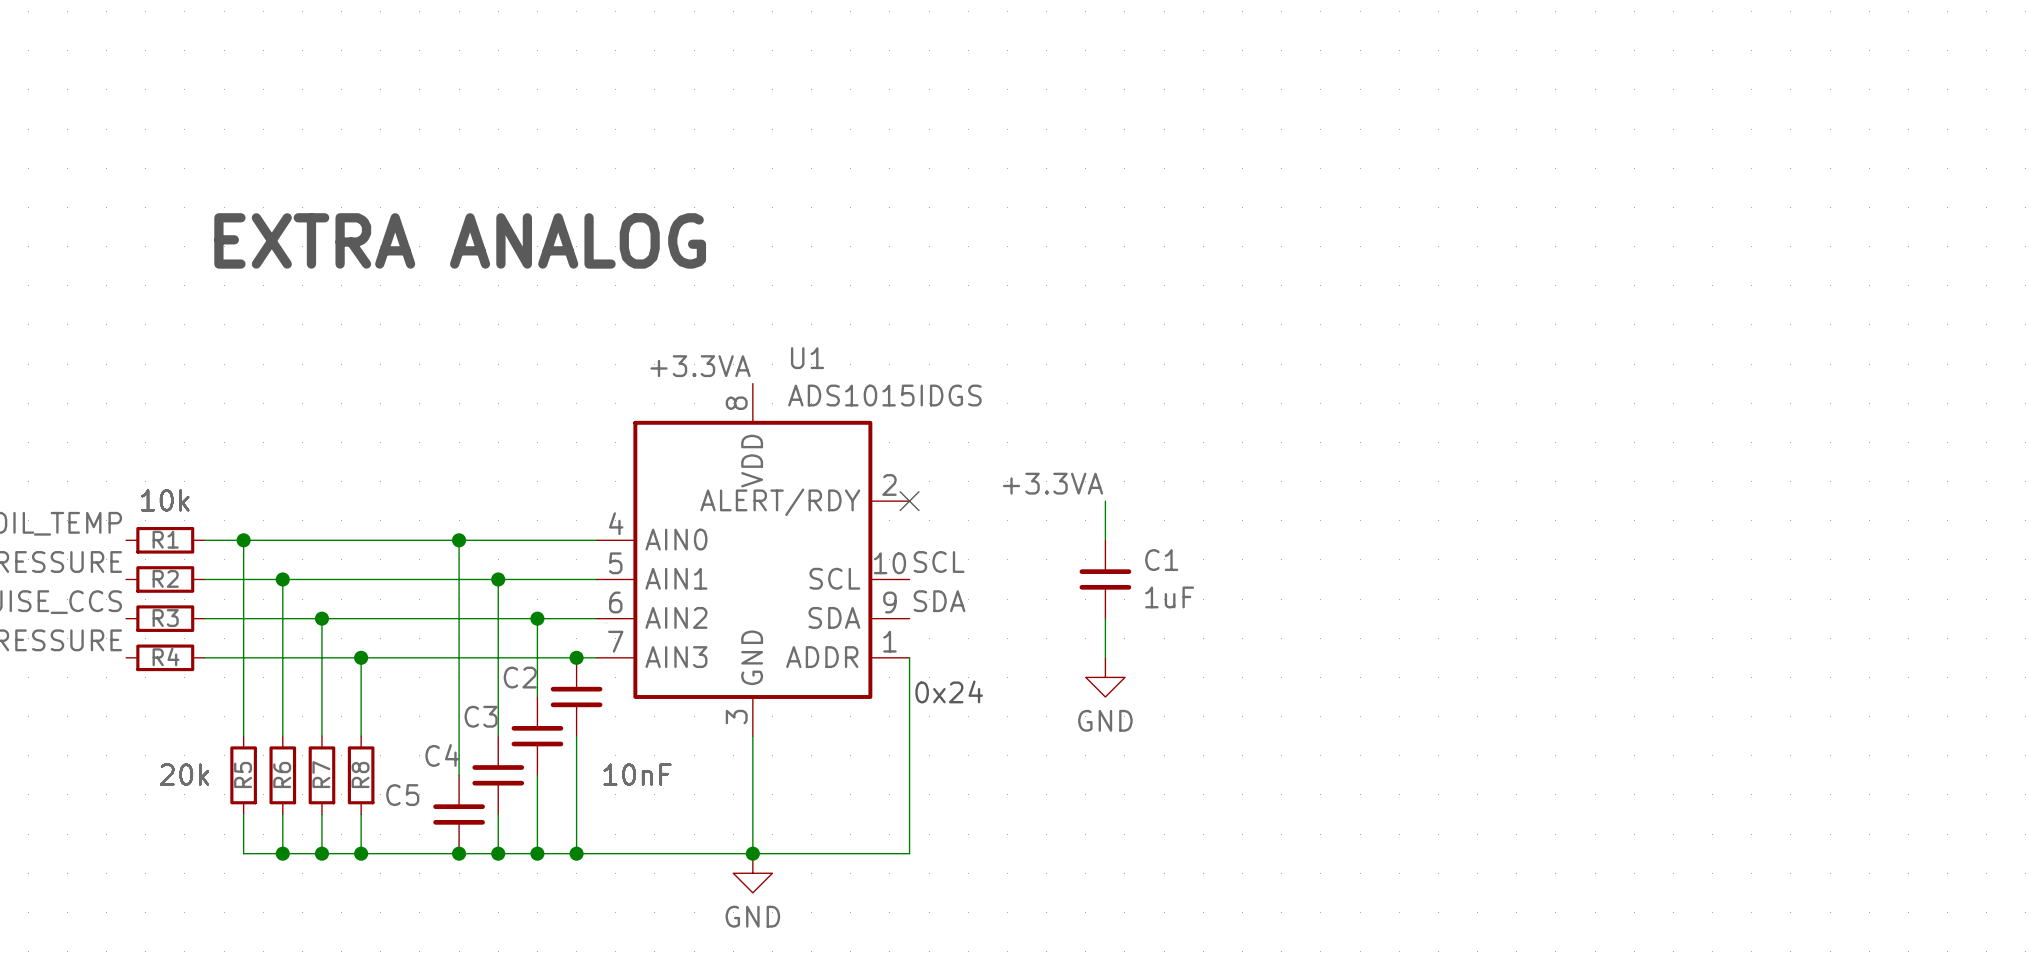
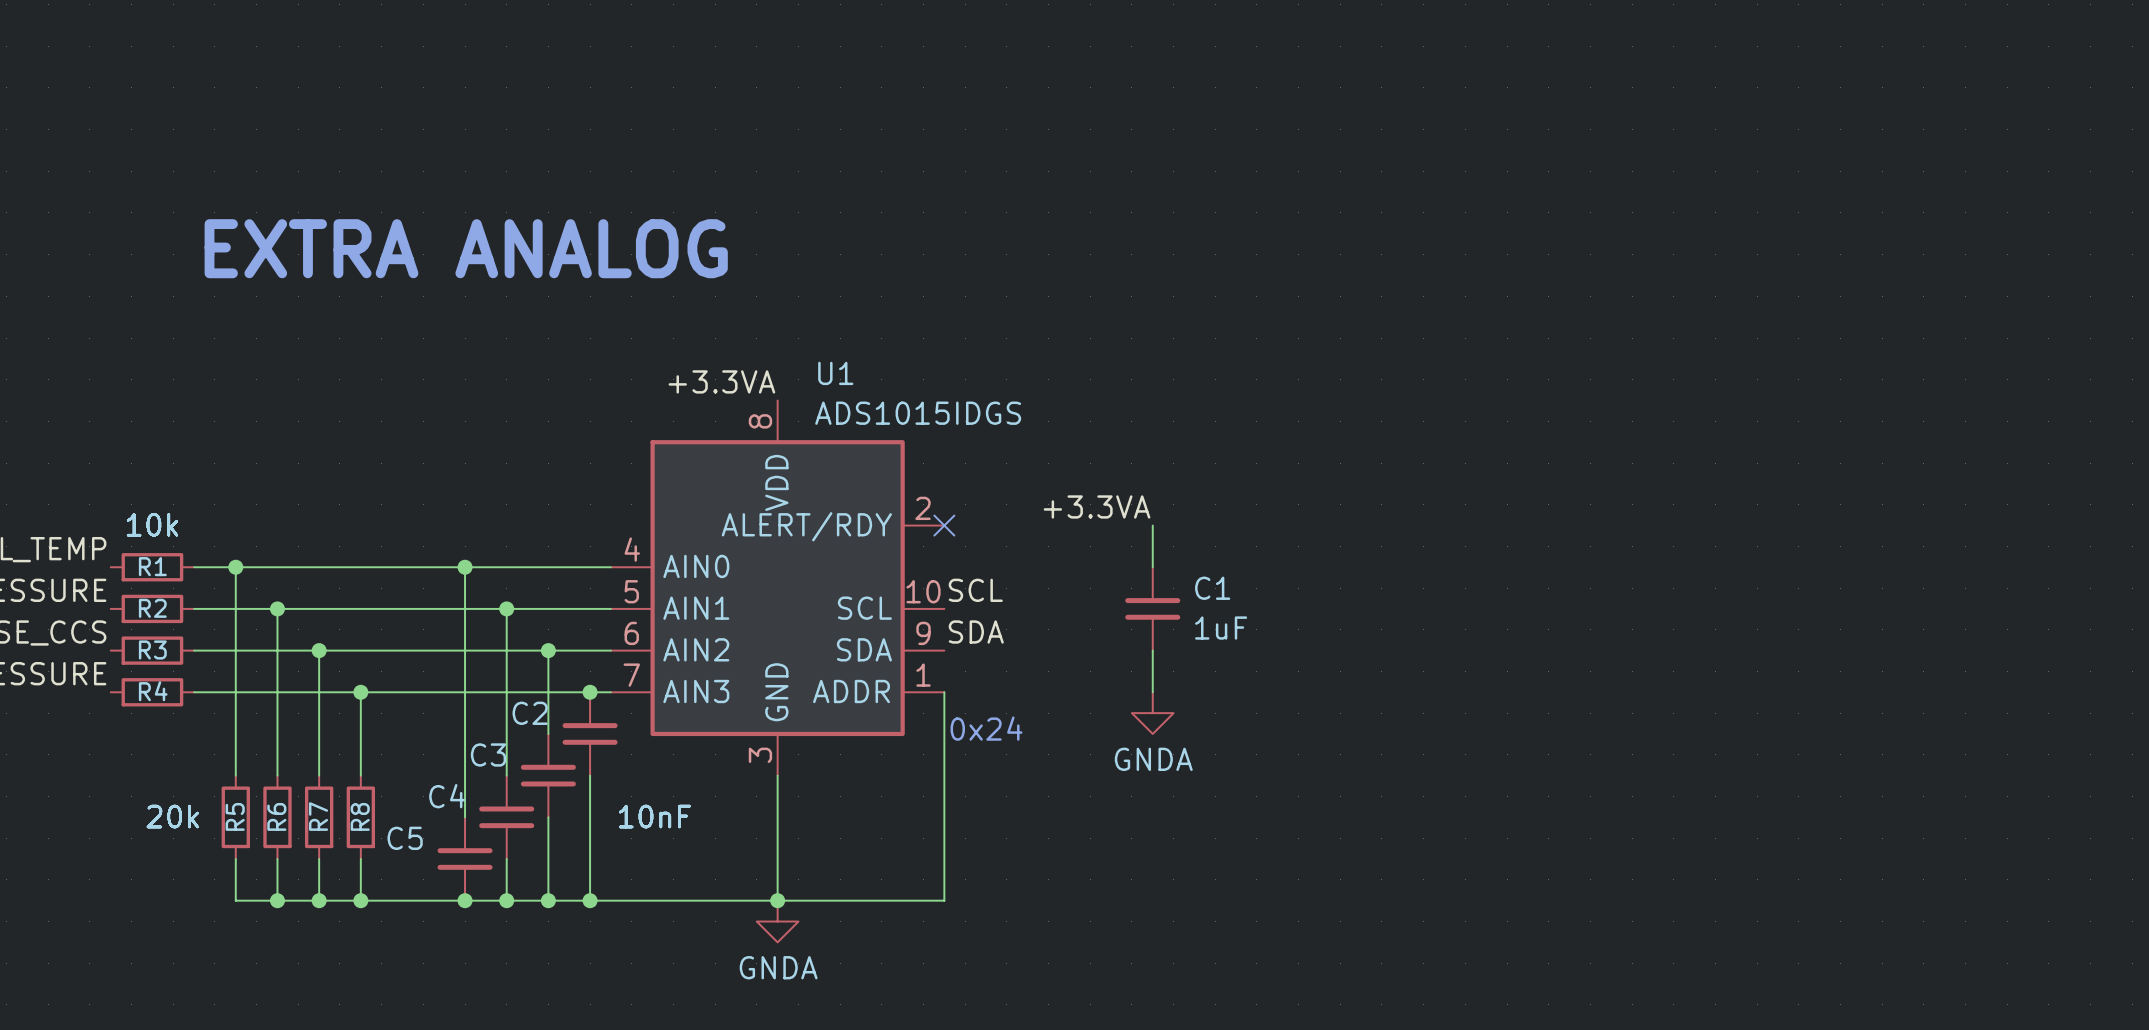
power symbol: GND (1105, 677) -> GNDA (1152, 713)
power symbol: GND (752, 873) -> GNDA (777, 921)

